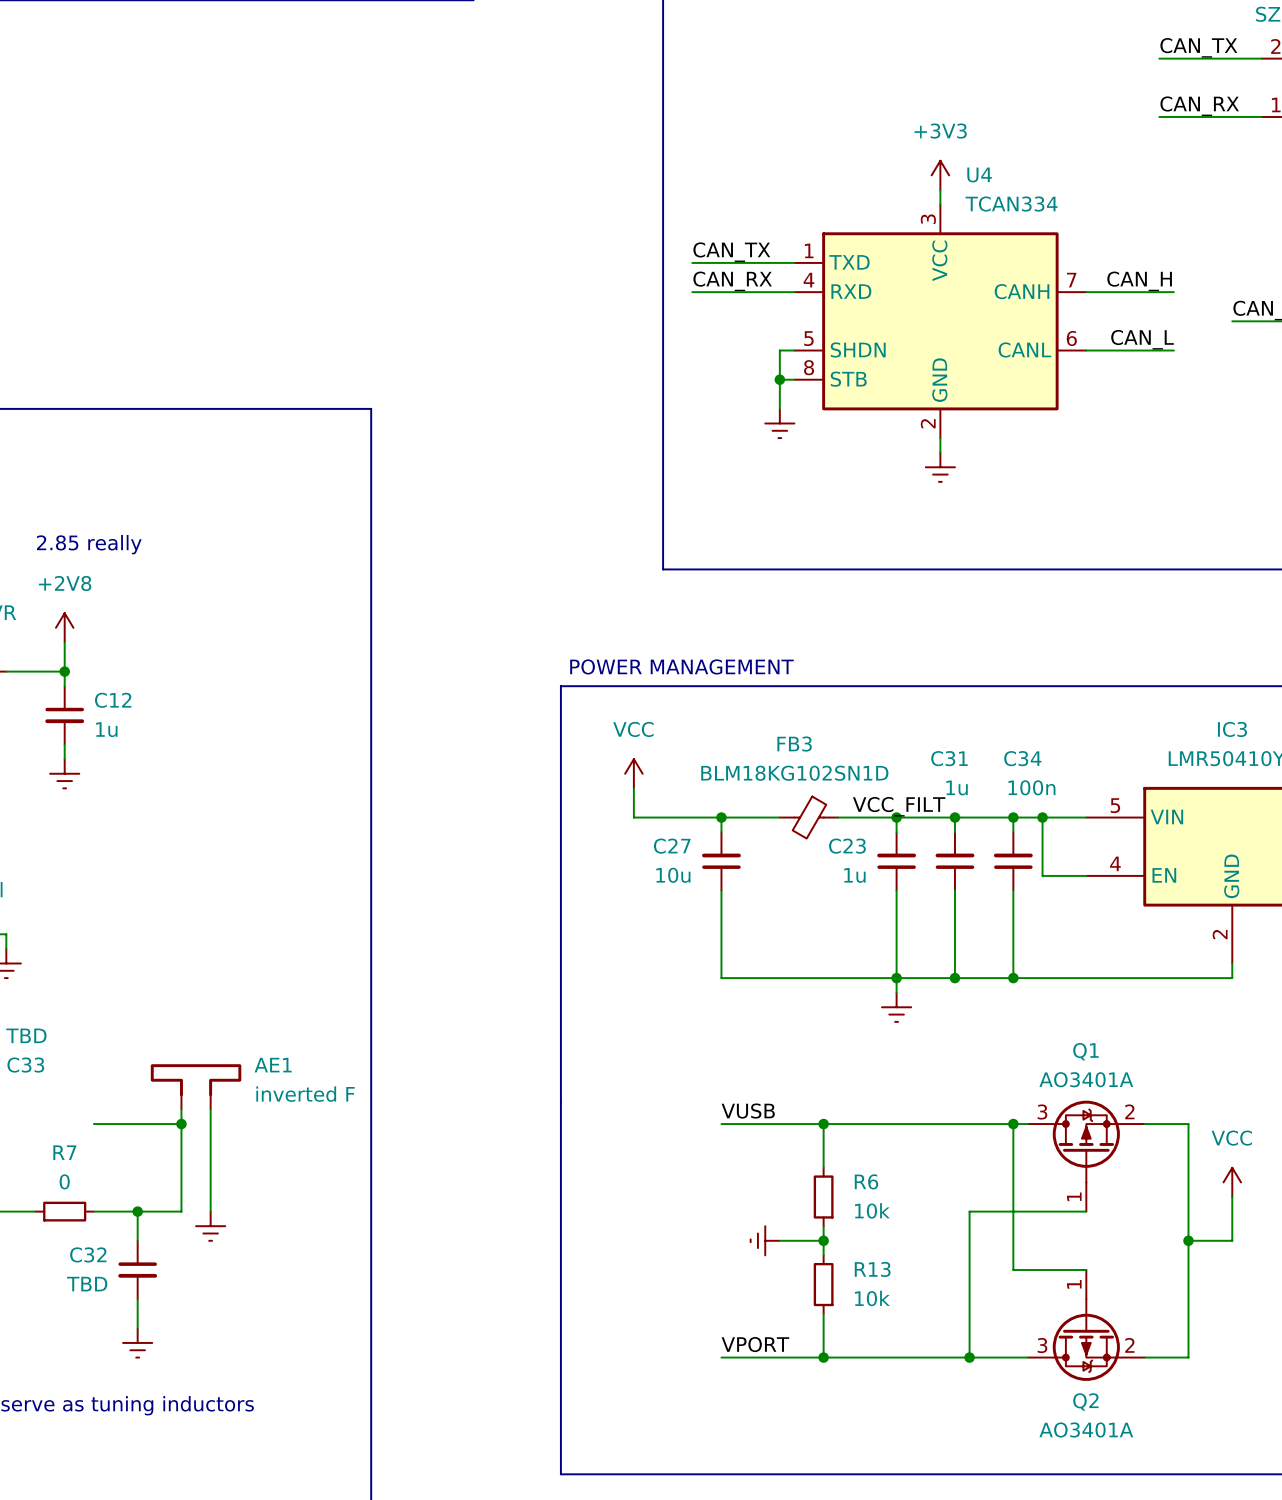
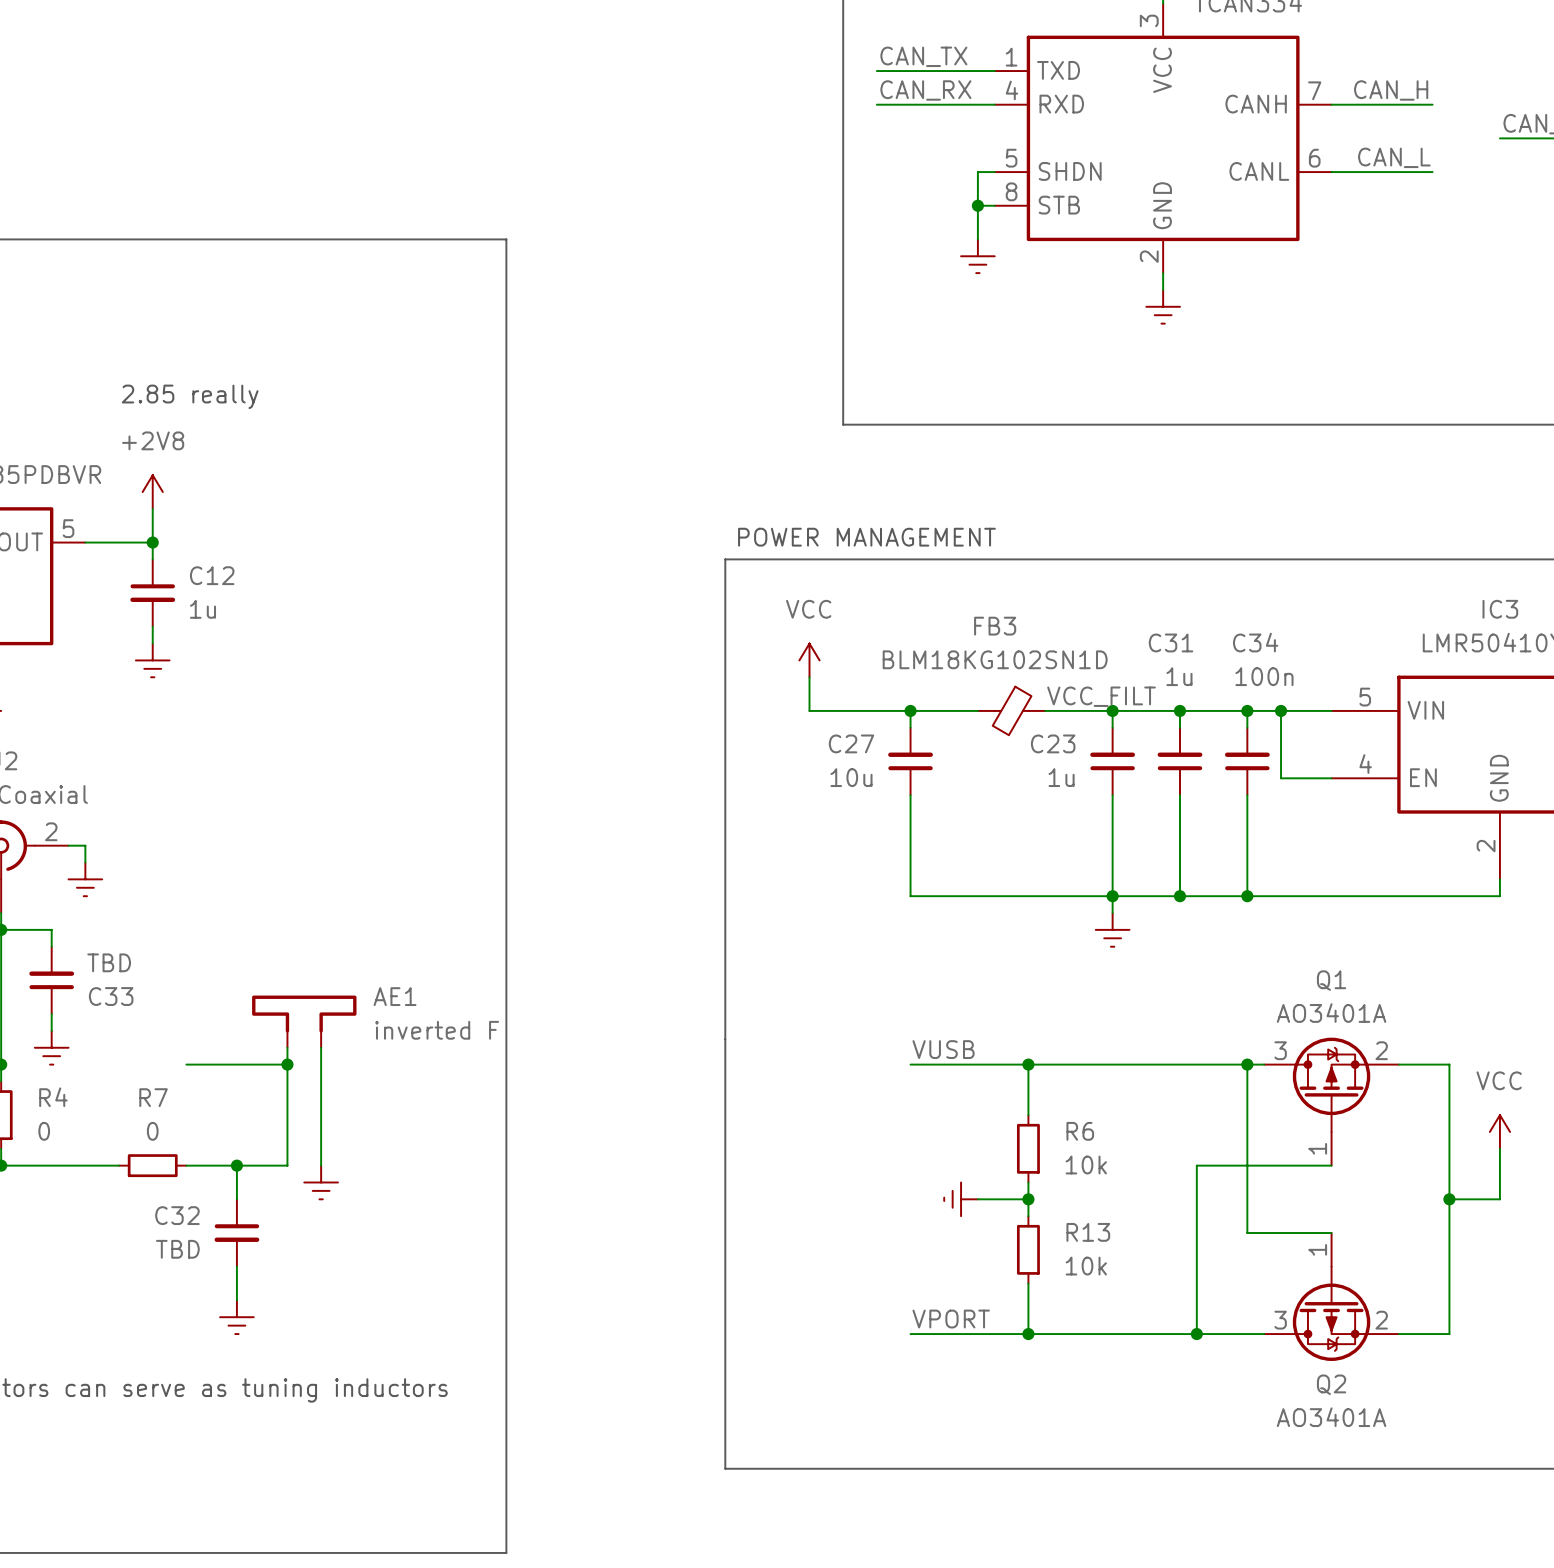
label position: VCC_FILT (899, 806) -> VCC_FILT (1101, 696)

